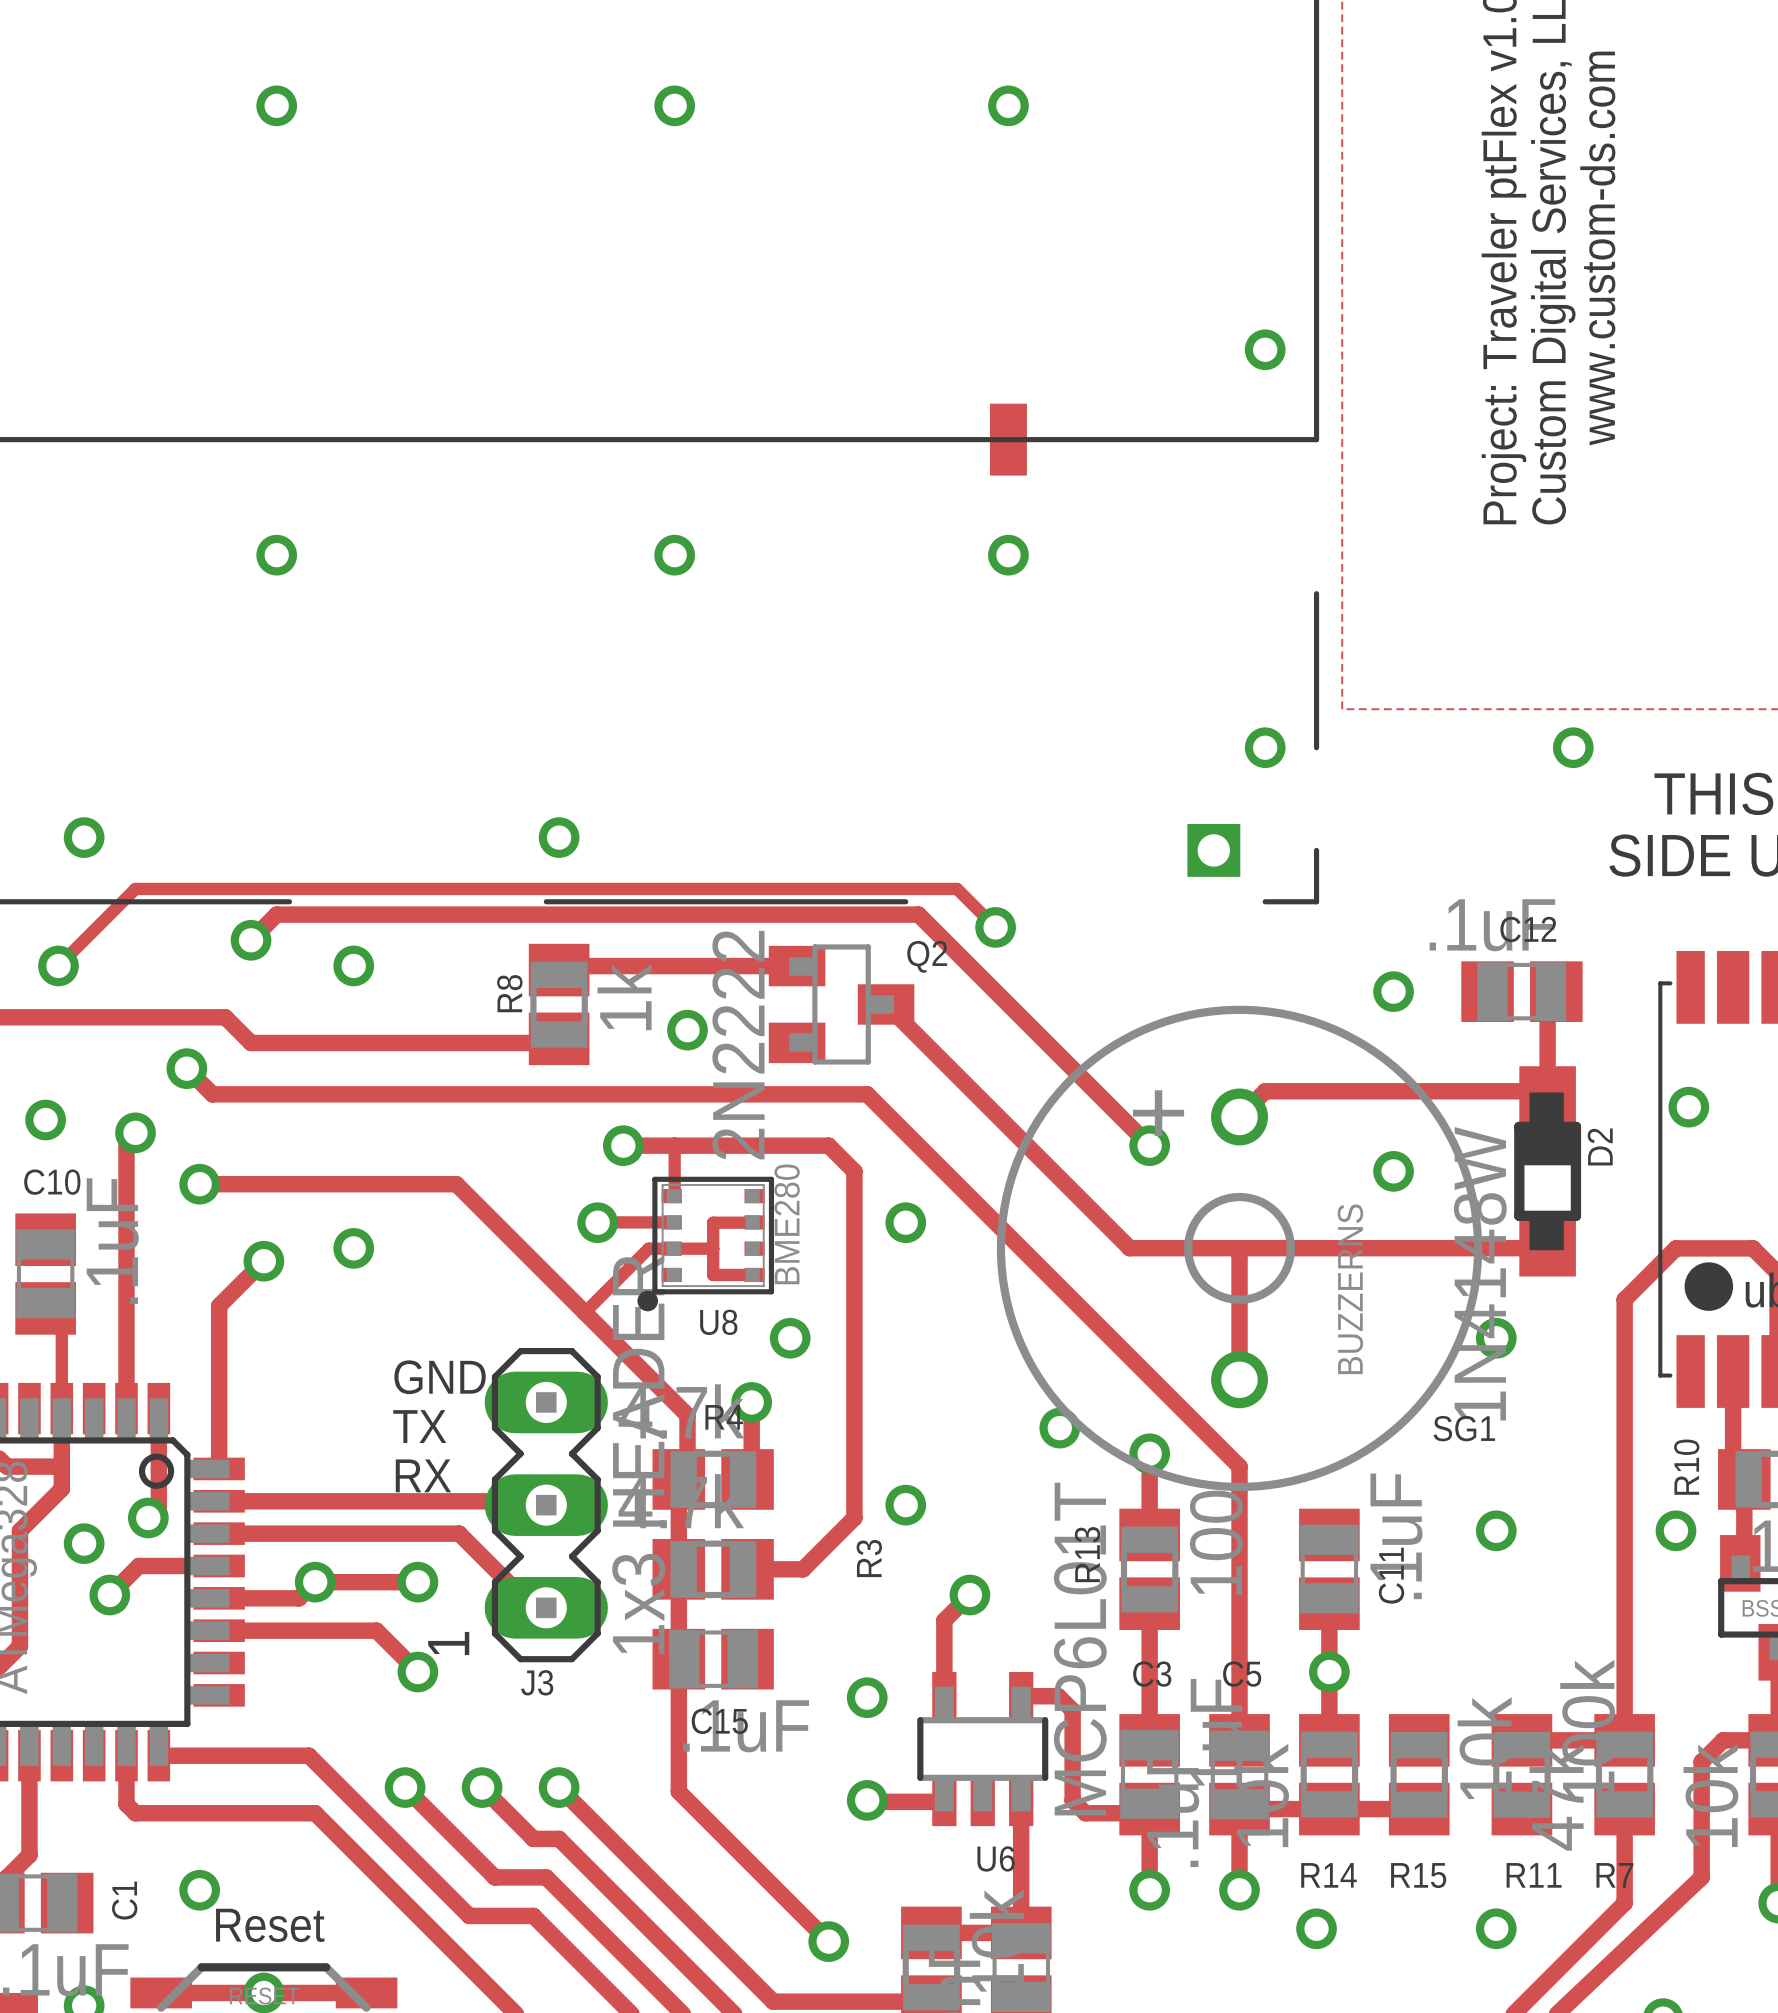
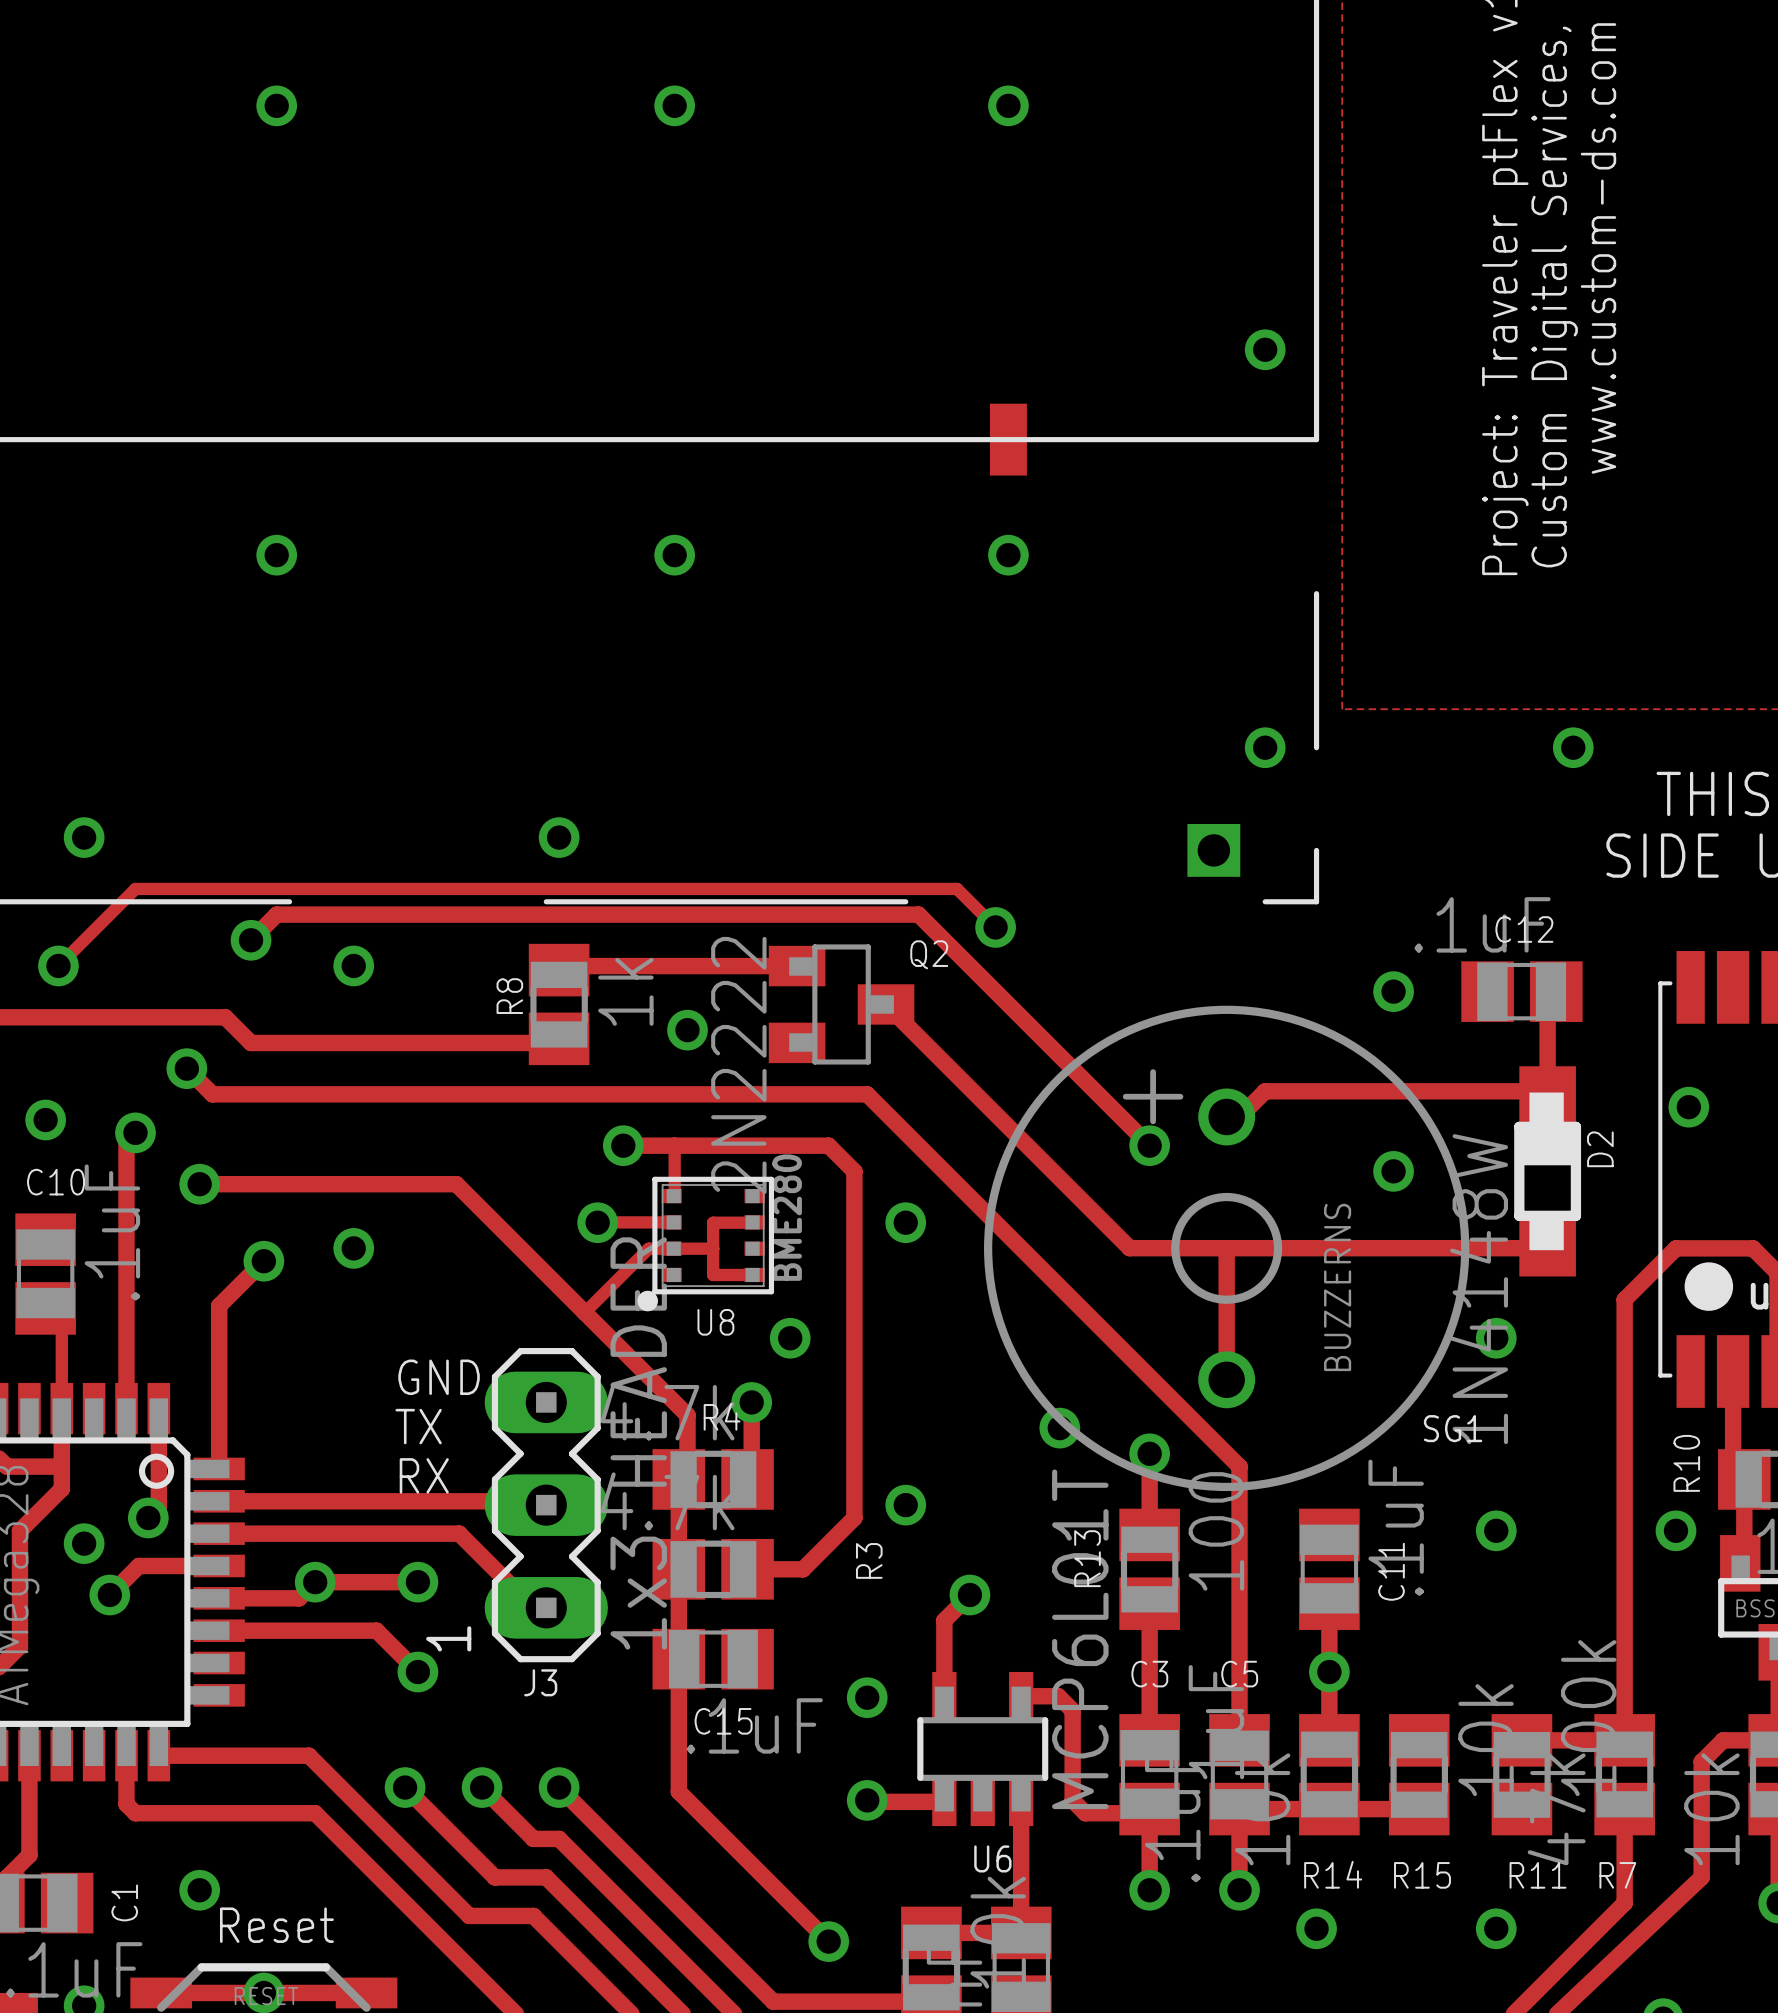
track: (1239, 1248) (1239, 1379) -> (1226, 1248) (1226, 1379)
SG1 position: (1239, 1248) -> (1226, 1248)

